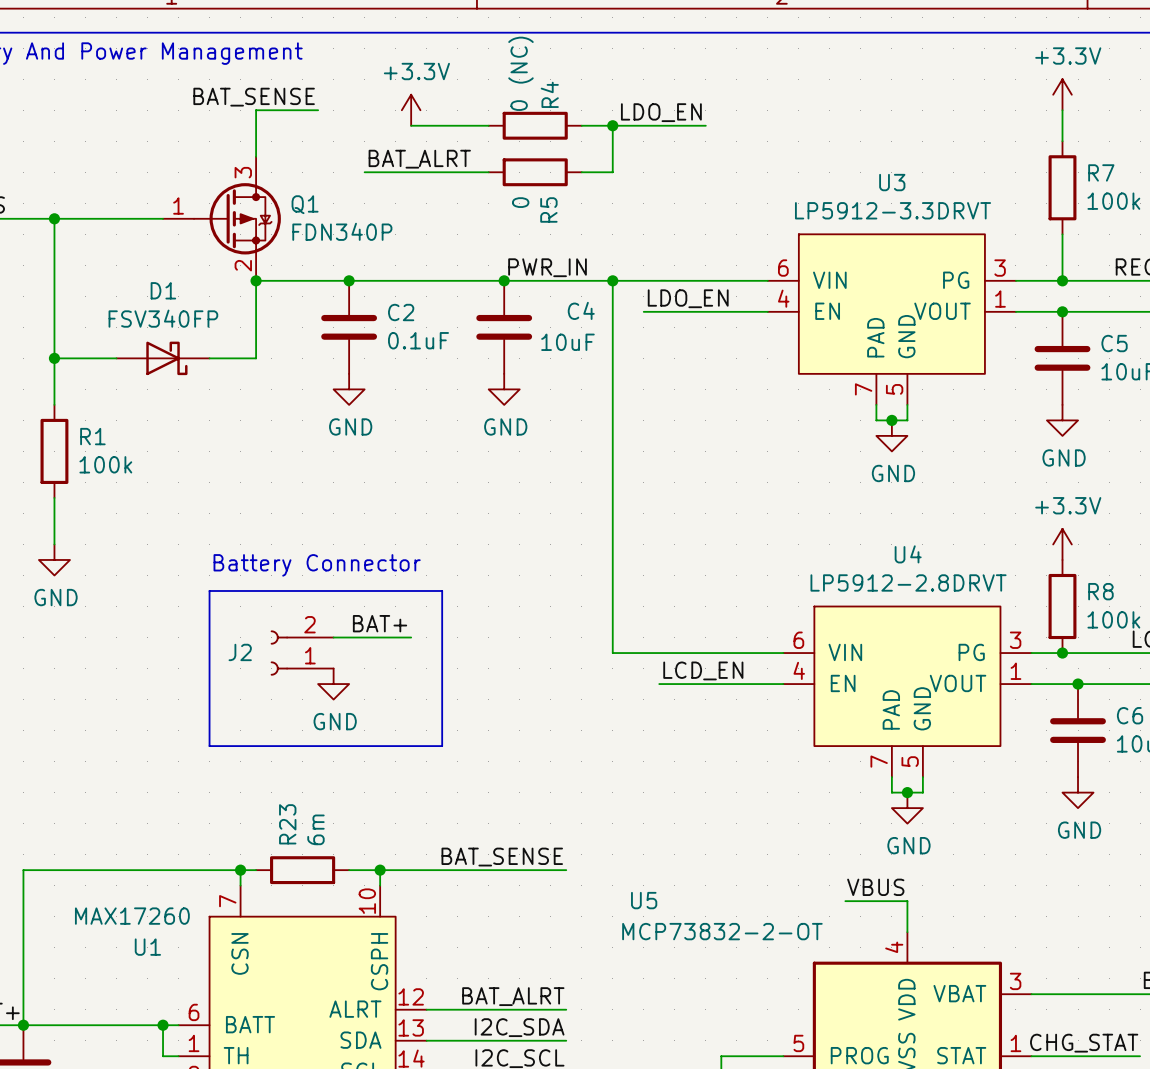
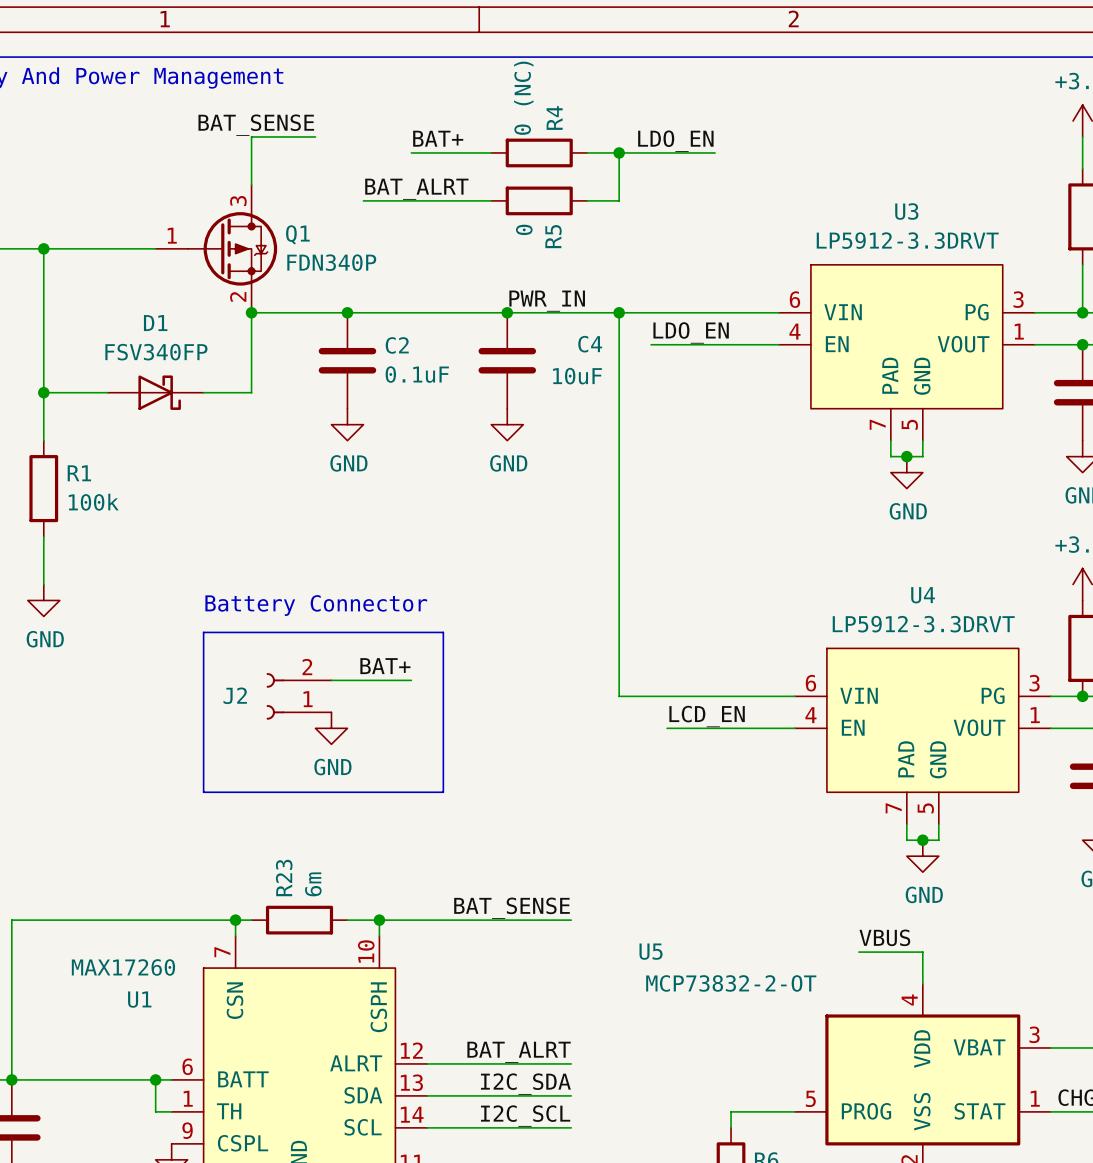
power symbol: +3.3V (411, 110) -> none
label: none -> BAT+ (438, 138)
U4 value: LP5912-2.8DRVT (908, 582) -> LP5912-3.3DRVT (923, 624)

